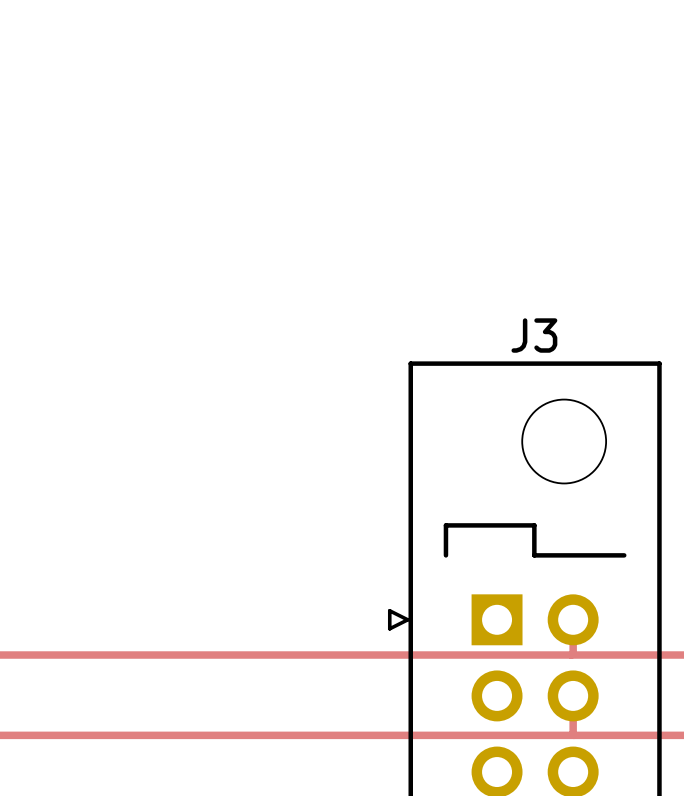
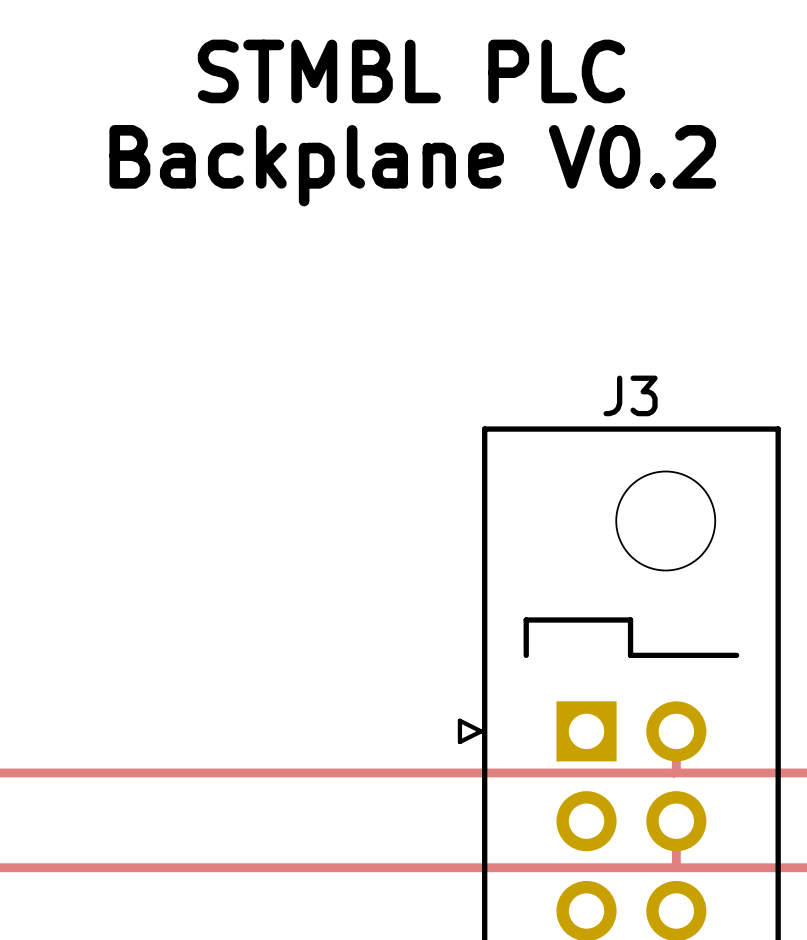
text: none -> STMBL PLC (411, 71)
text: none -> Backplane V0.2 (412, 165)

